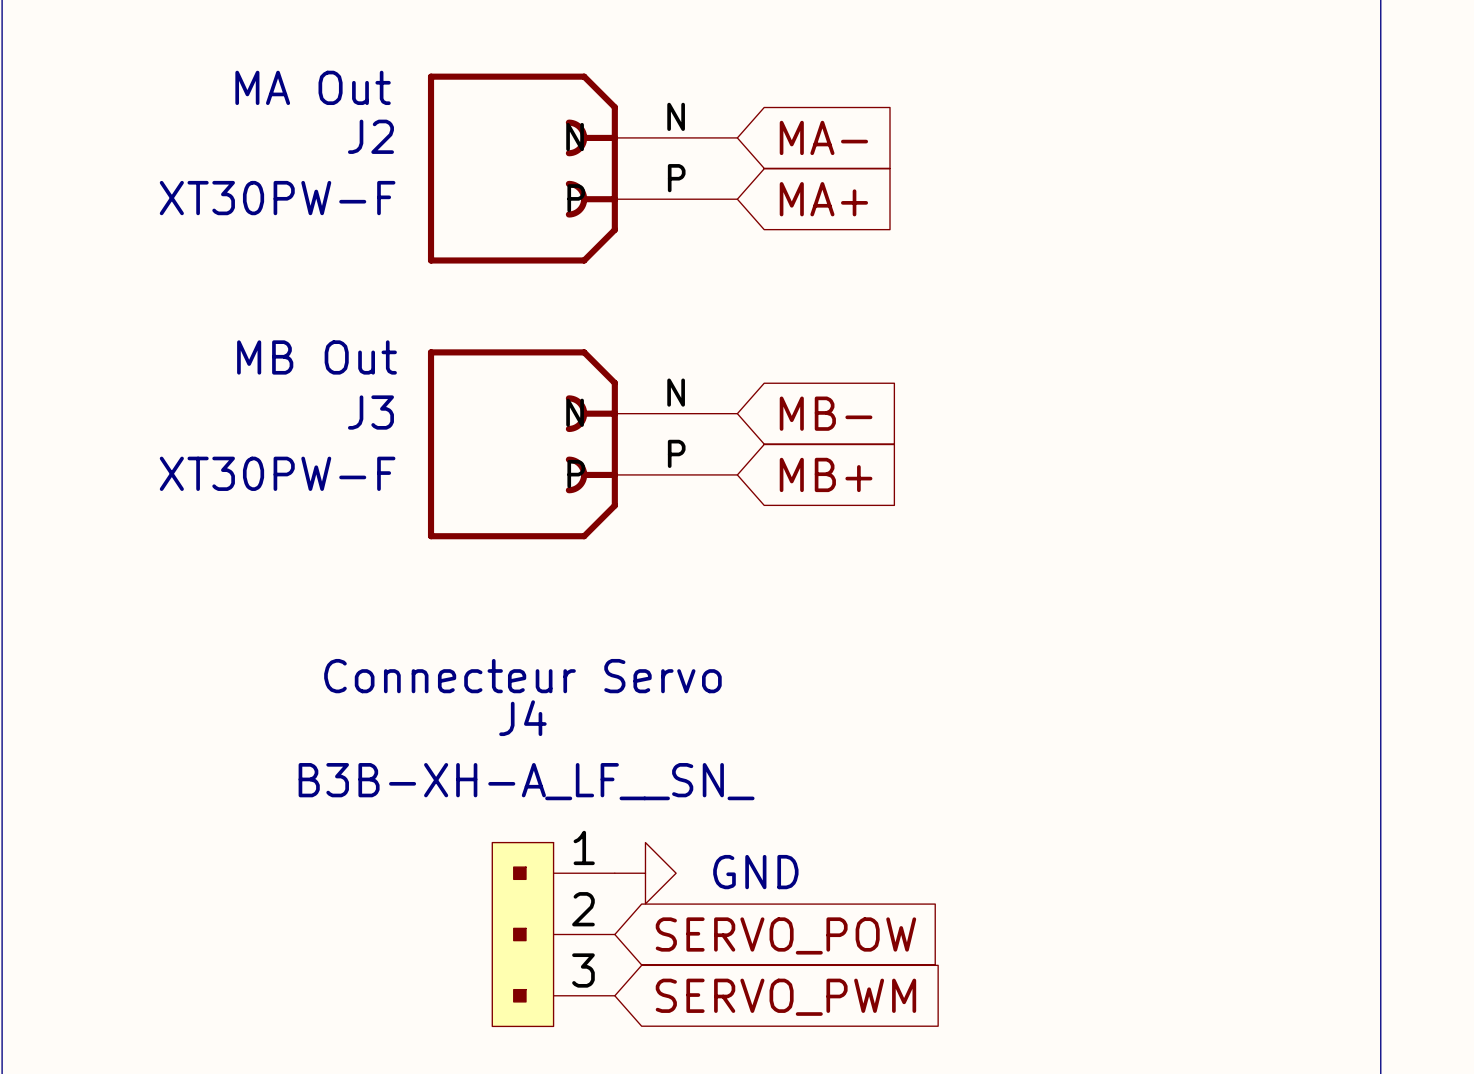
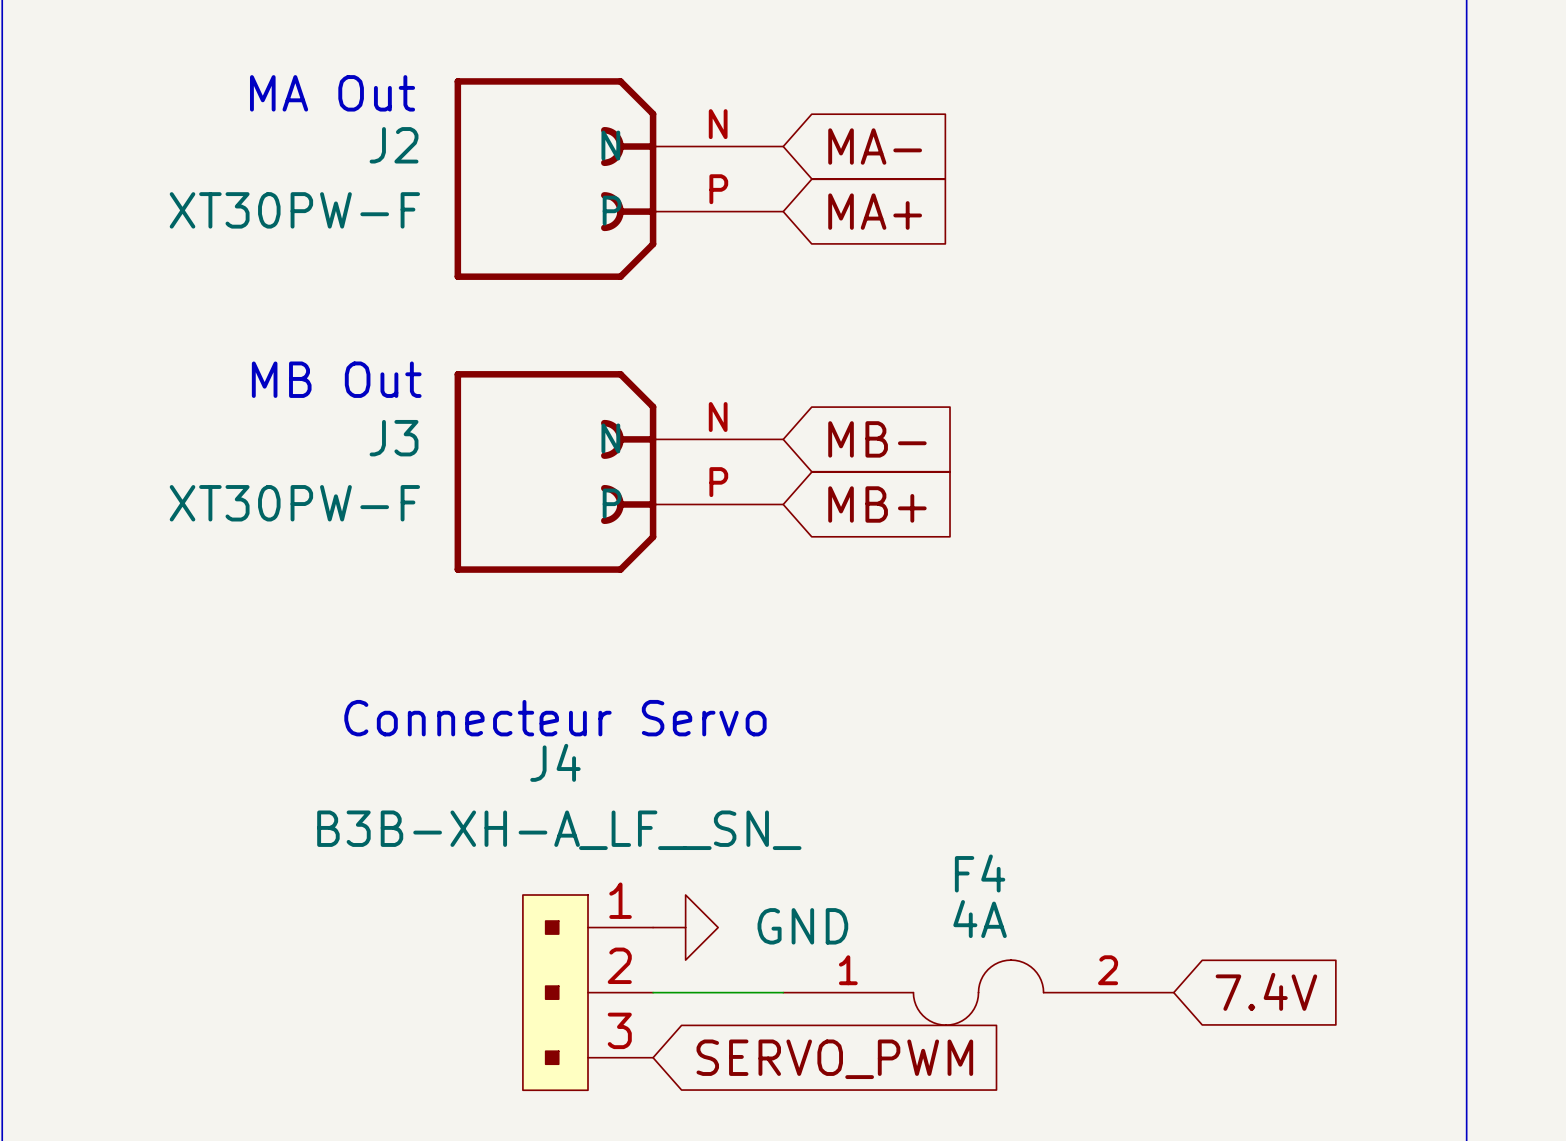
global label: none -> 7.4V (1266, 991)
wire: none -> (653, 992) (783, 992)
F4: none -> 4A (978, 992)
global label: SERVO_POW (785, 935) -> none

